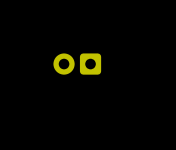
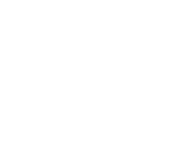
part: (77, 64) -> none

